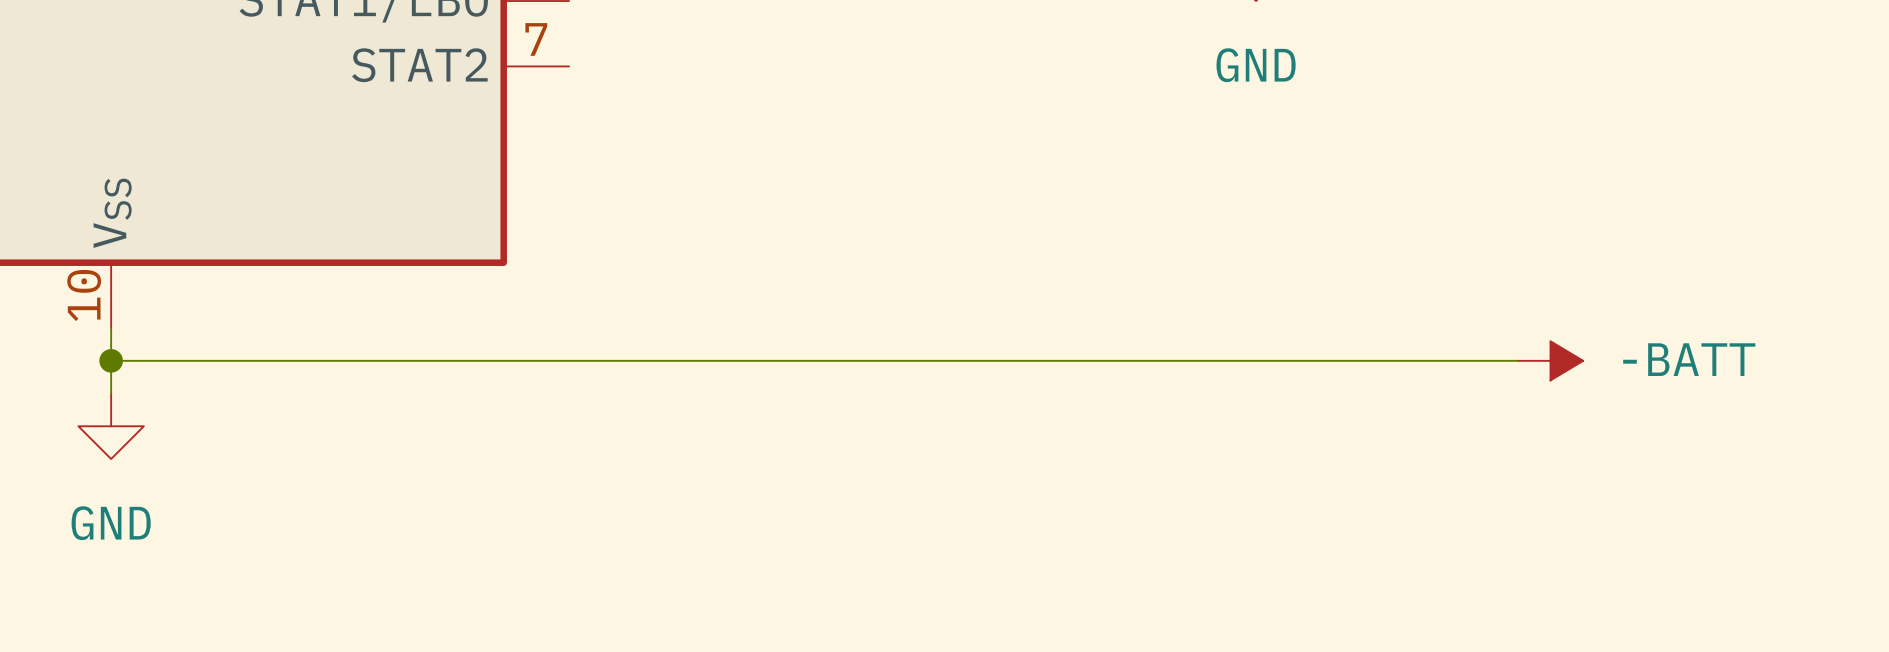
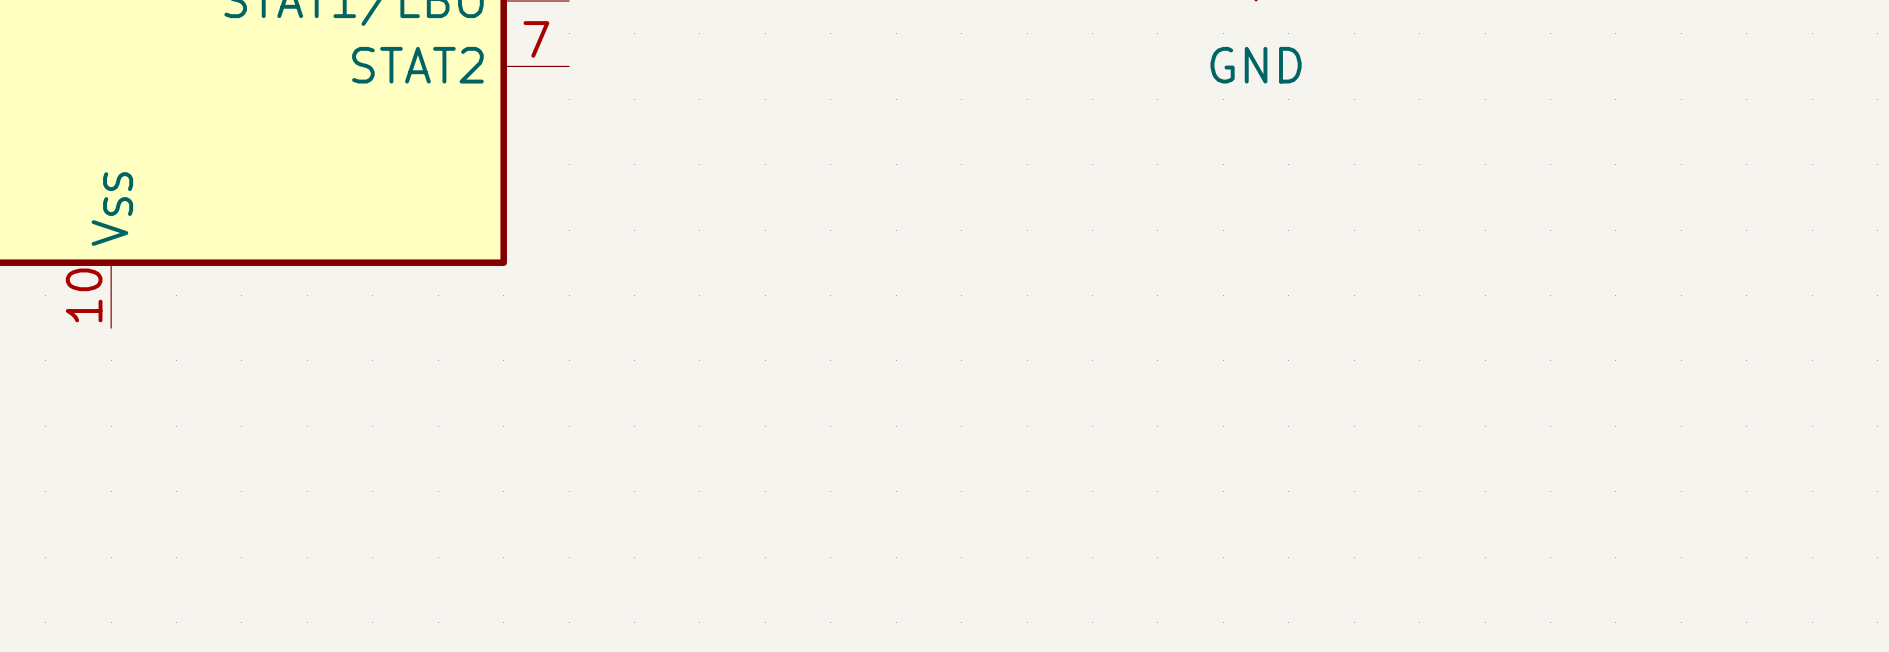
wire: (111, 328) (111, 393) -> none
wire: (111, 360) (1517, 360) -> none
junction: (111, 360) -> none
power symbol: -BATT (1550, 360) -> none
power symbol: GND (111, 426) -> none

